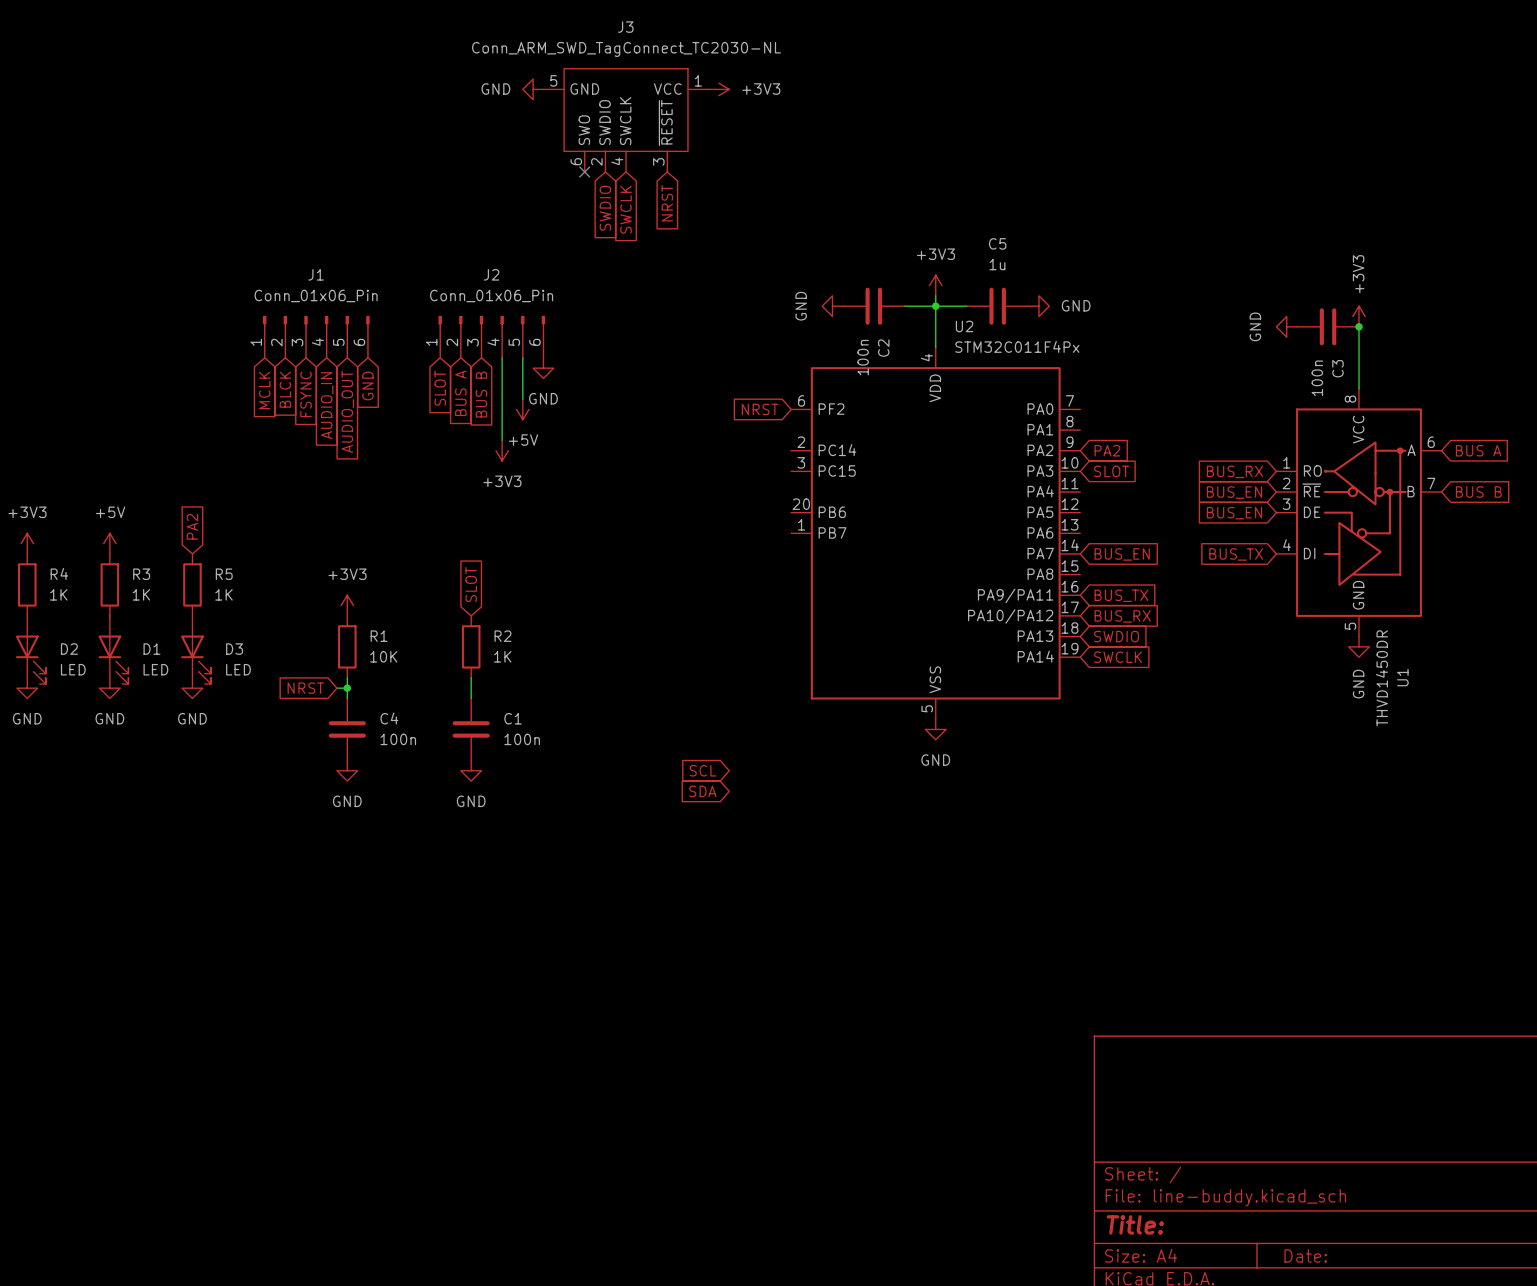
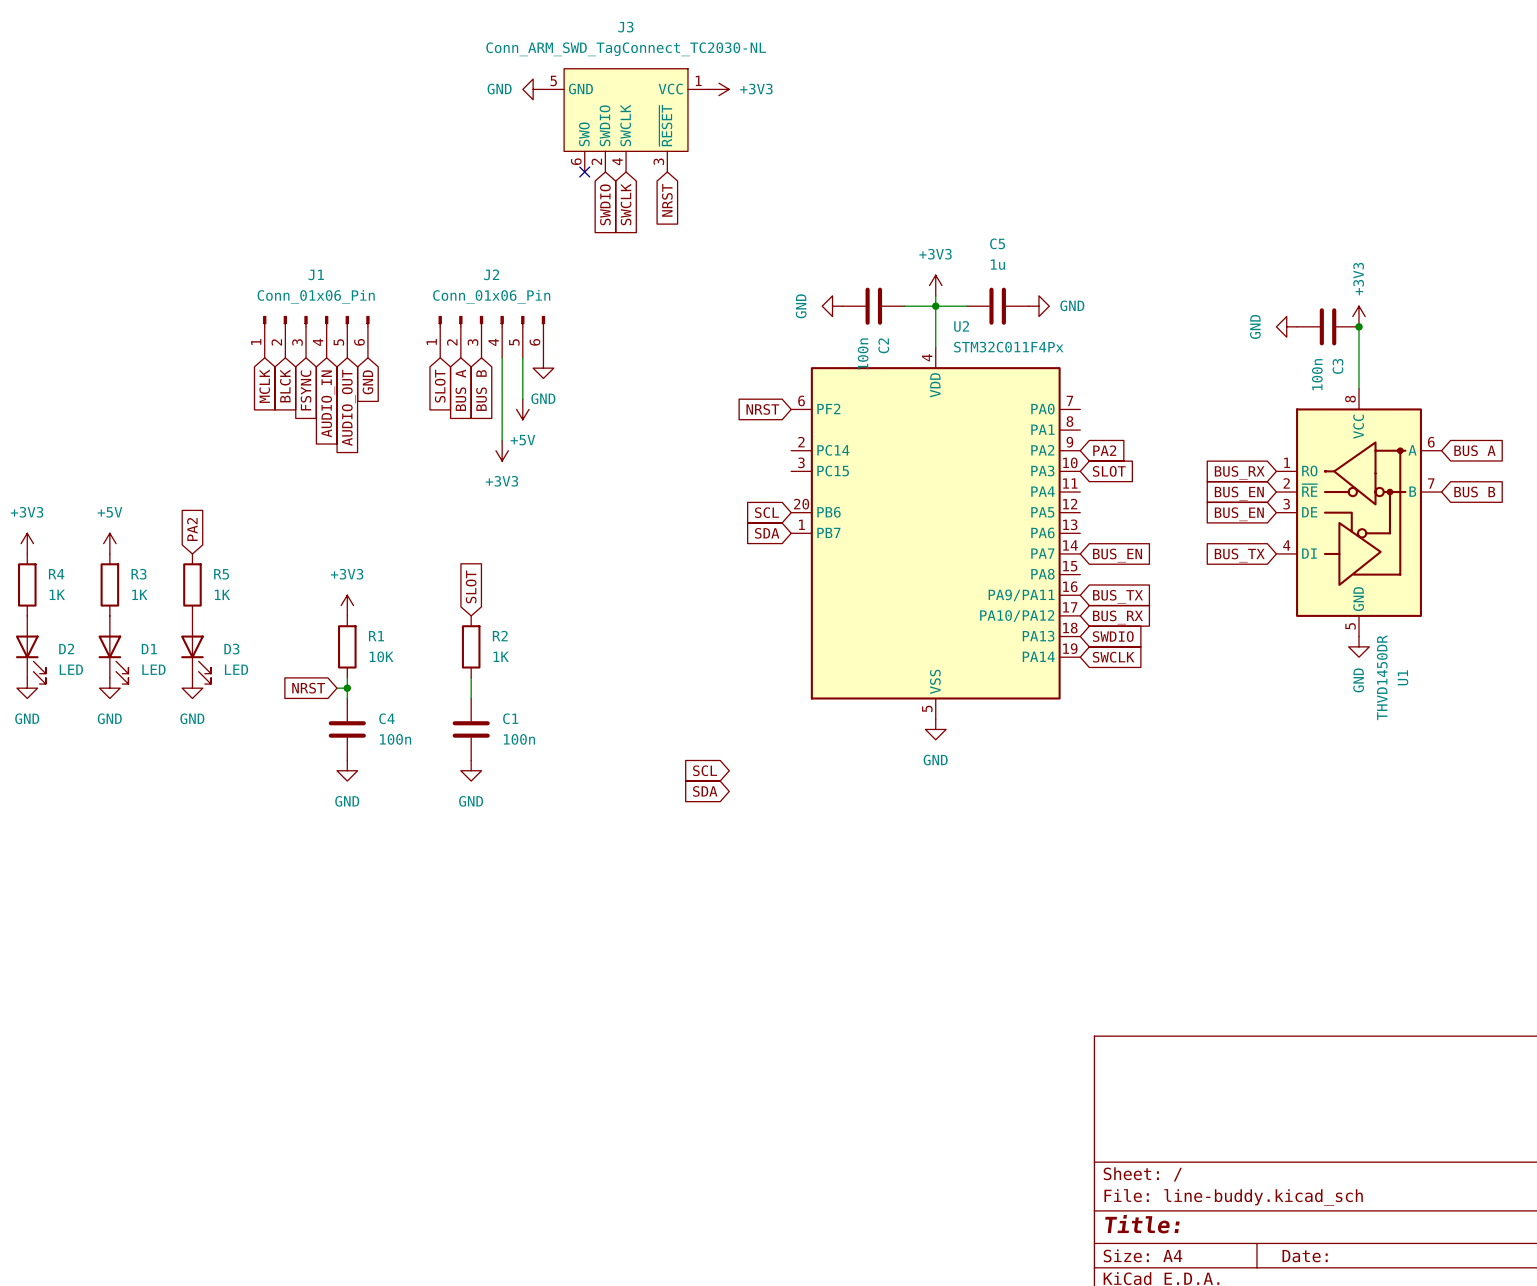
global label: none -> SCL (766, 512)
global label: none -> SDA (767, 533)

